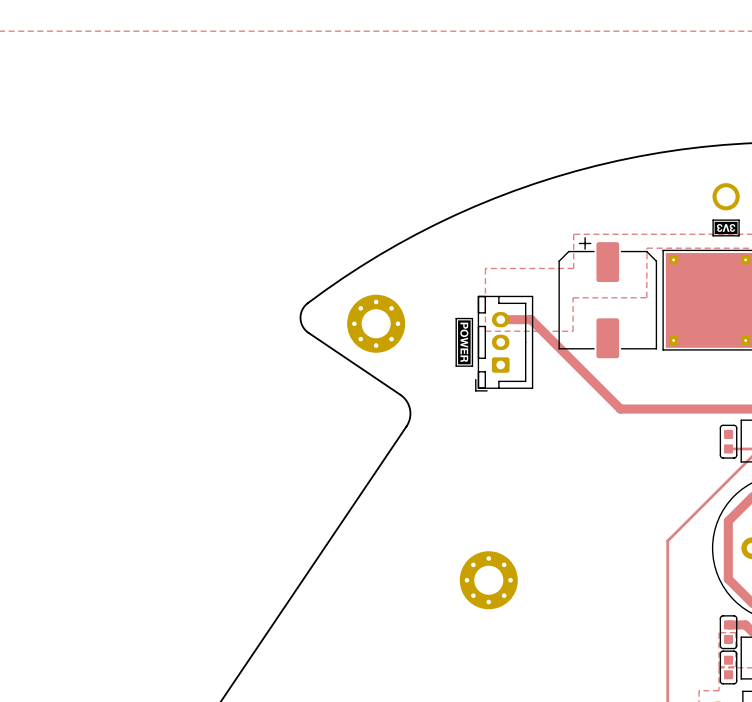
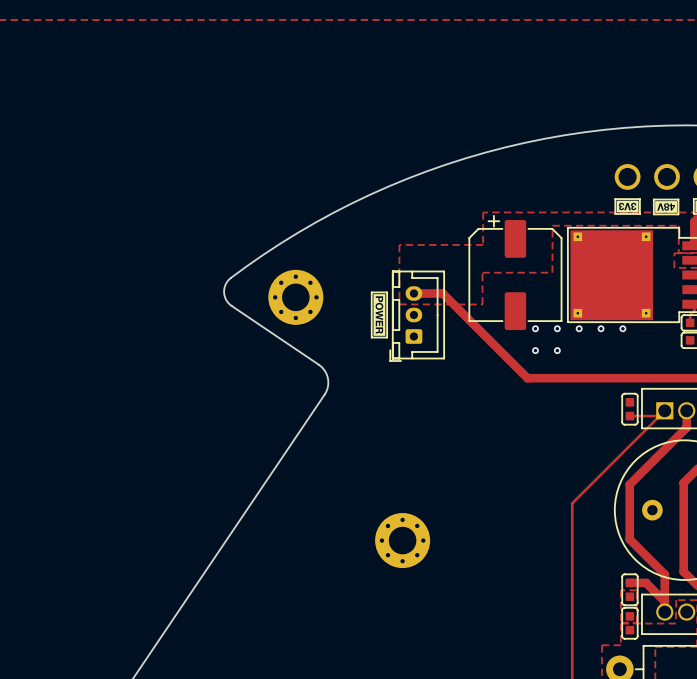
via: none -> (535, 328)
via: none -> (557, 328)
via: none -> (579, 328)
via: none -> (601, 328)
via: none -> (622, 328)
via: none -> (535, 350)
via: none -> (557, 350)

